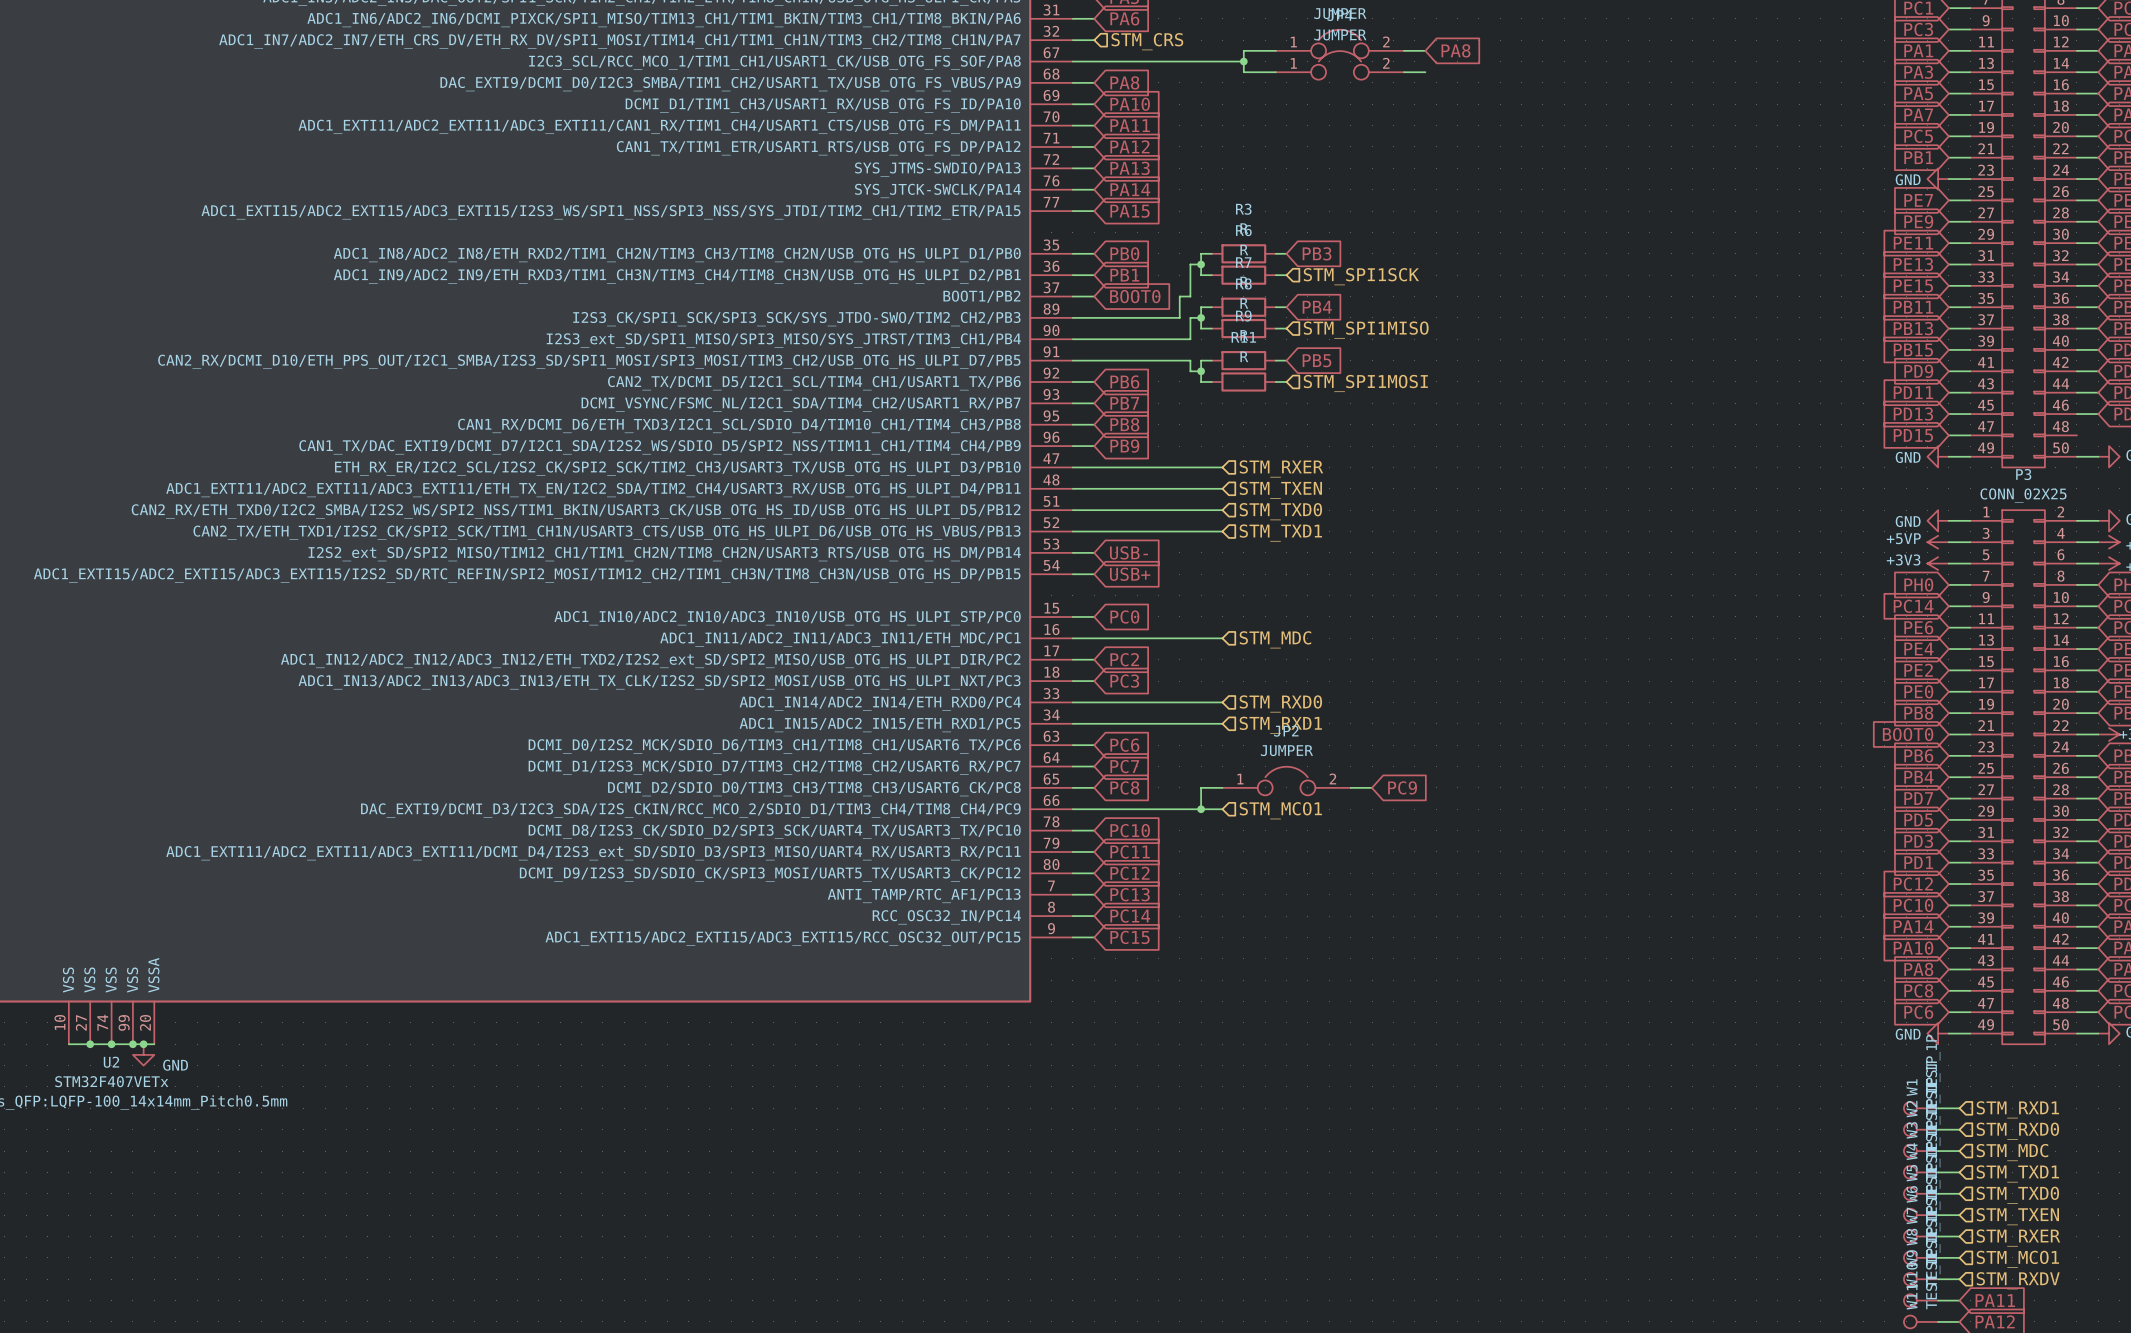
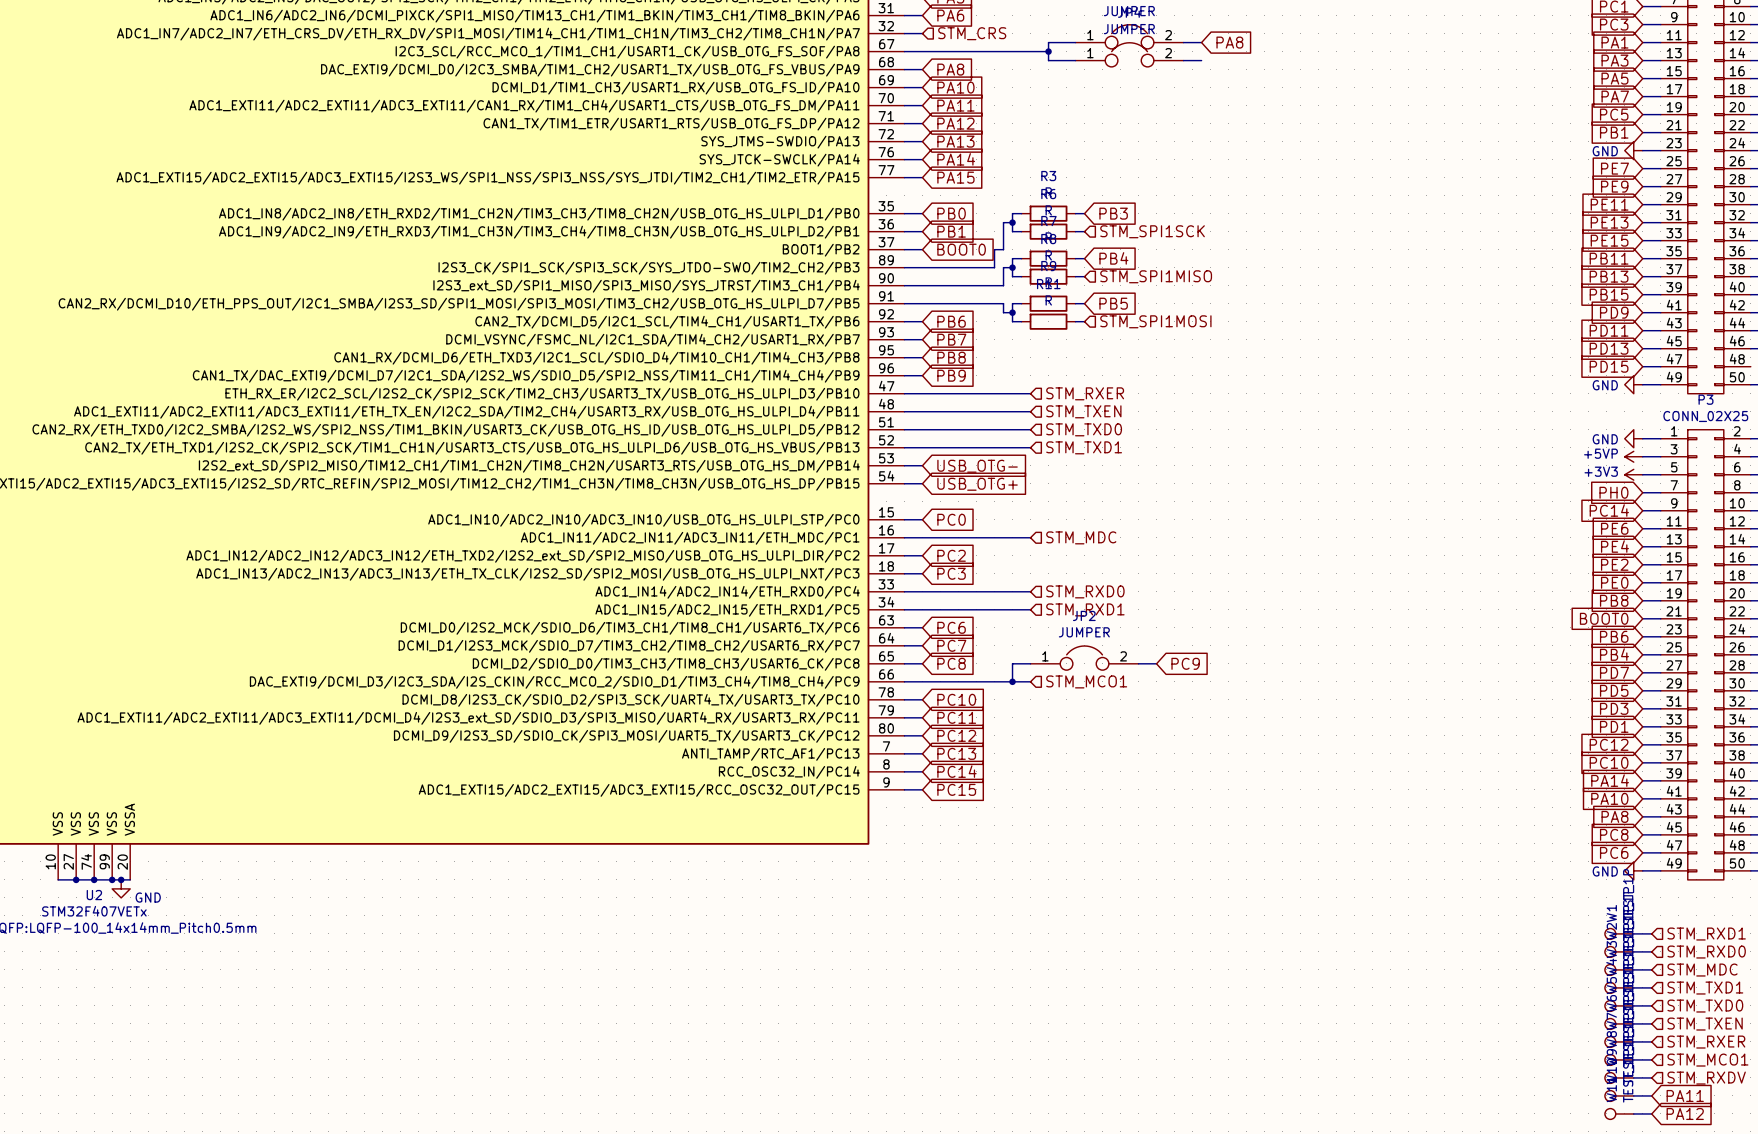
global label: USB- (1128, 552) -> USB_OTG- (977, 466)
global label: USB+ (1130, 574) -> USB_OTG+ (977, 484)

